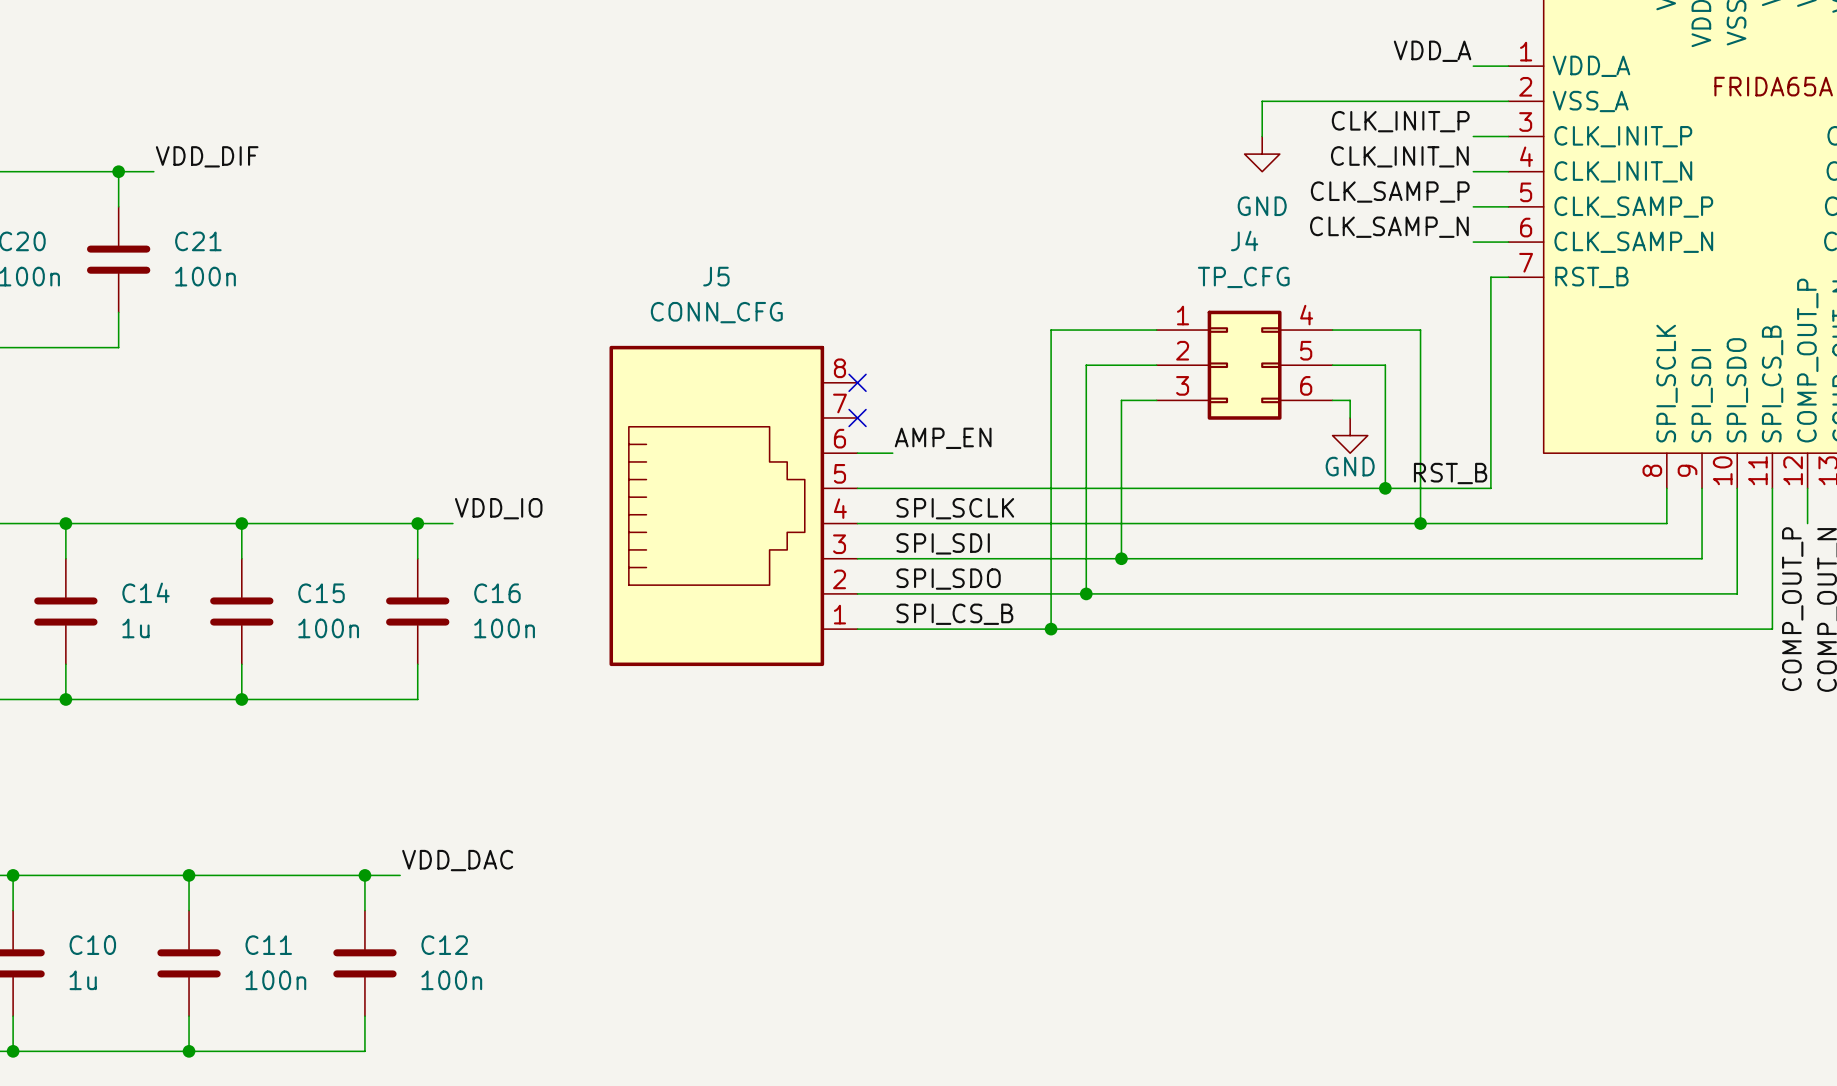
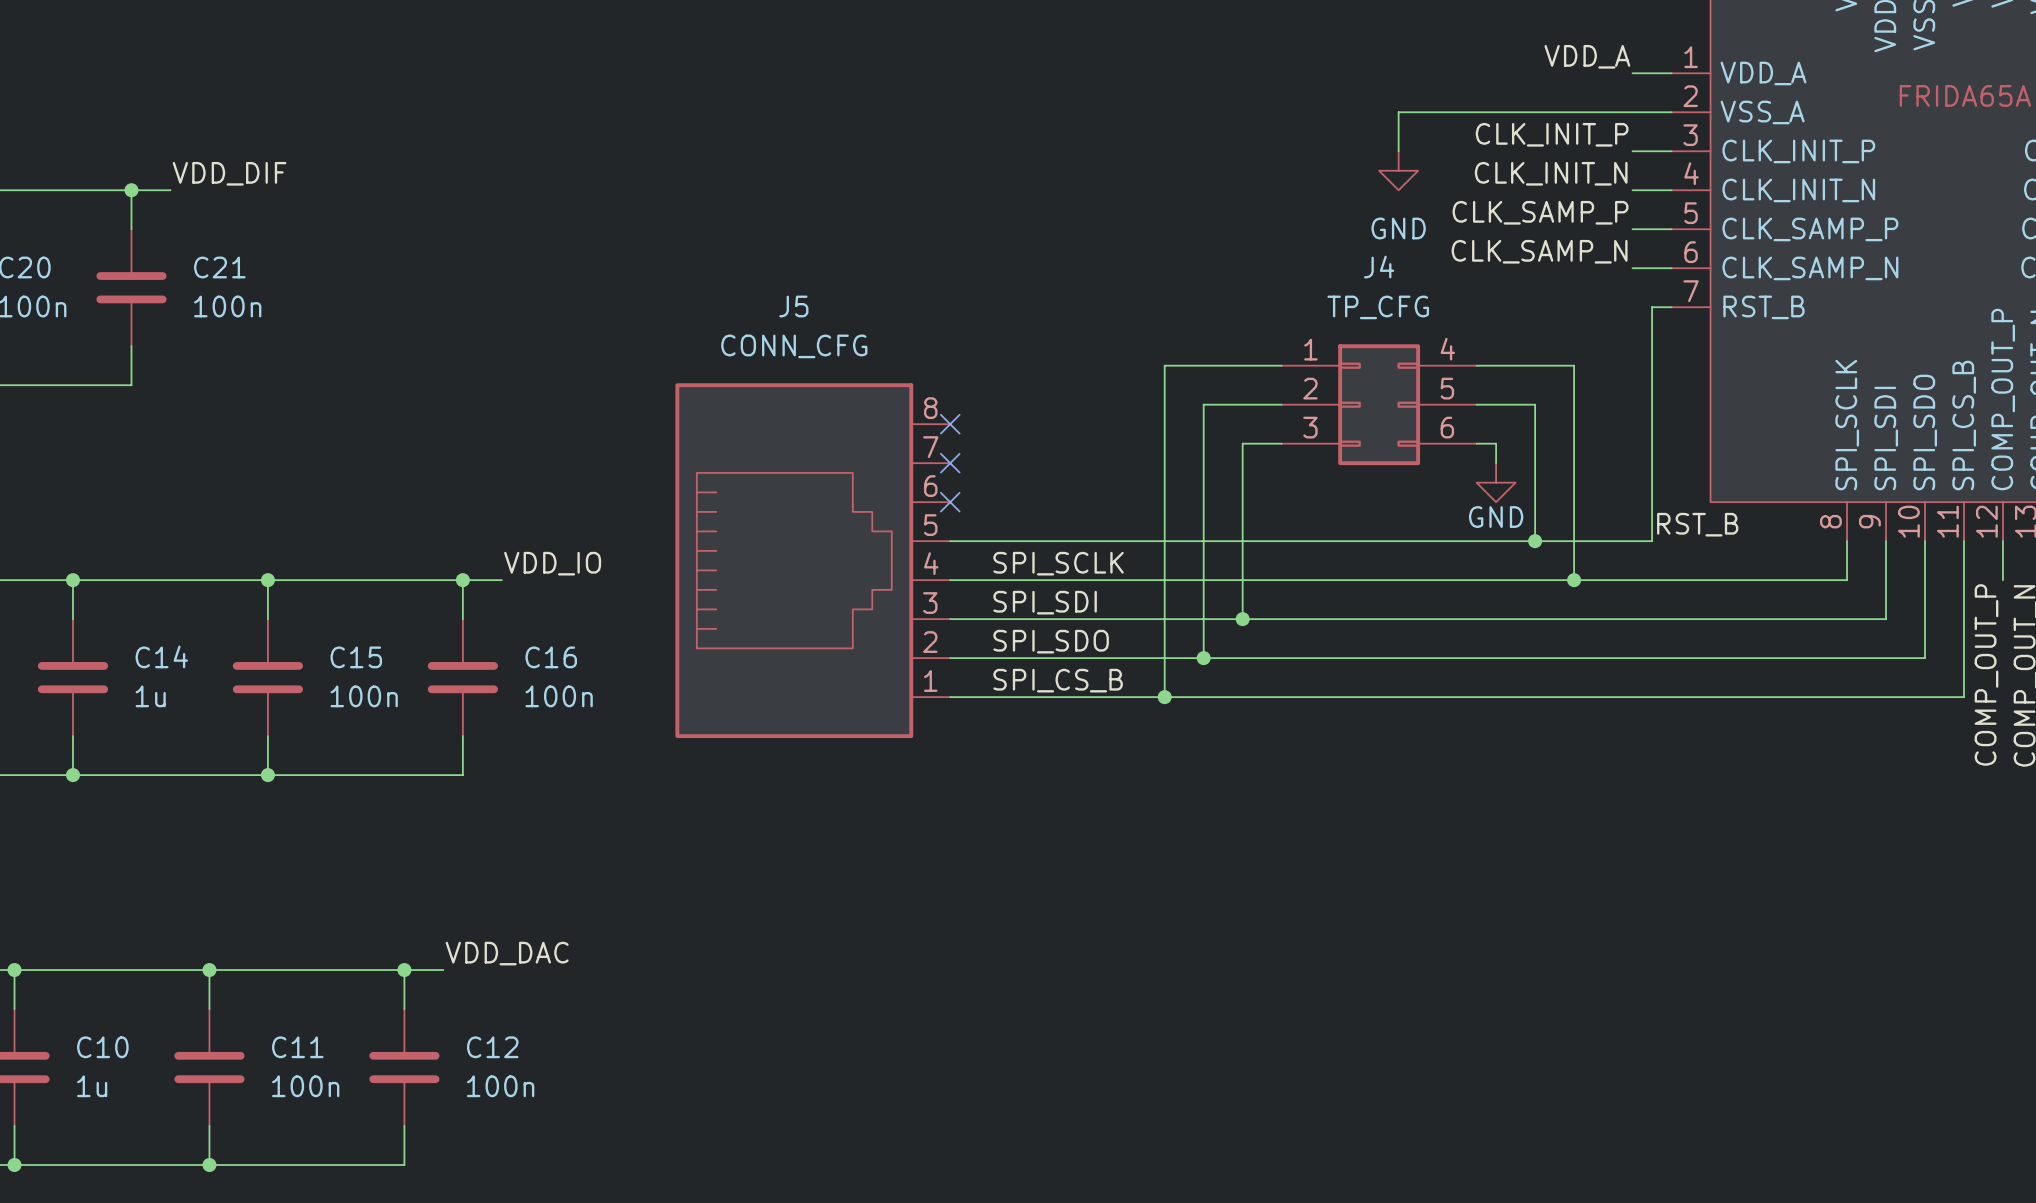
label: AMP_EN (943, 438) -> none
wire: (857, 453) (892, 453) -> none
no-connect mark: none -> (950, 502)
label position: RST_B (1450, 473) -> RST_B (1697, 524)

